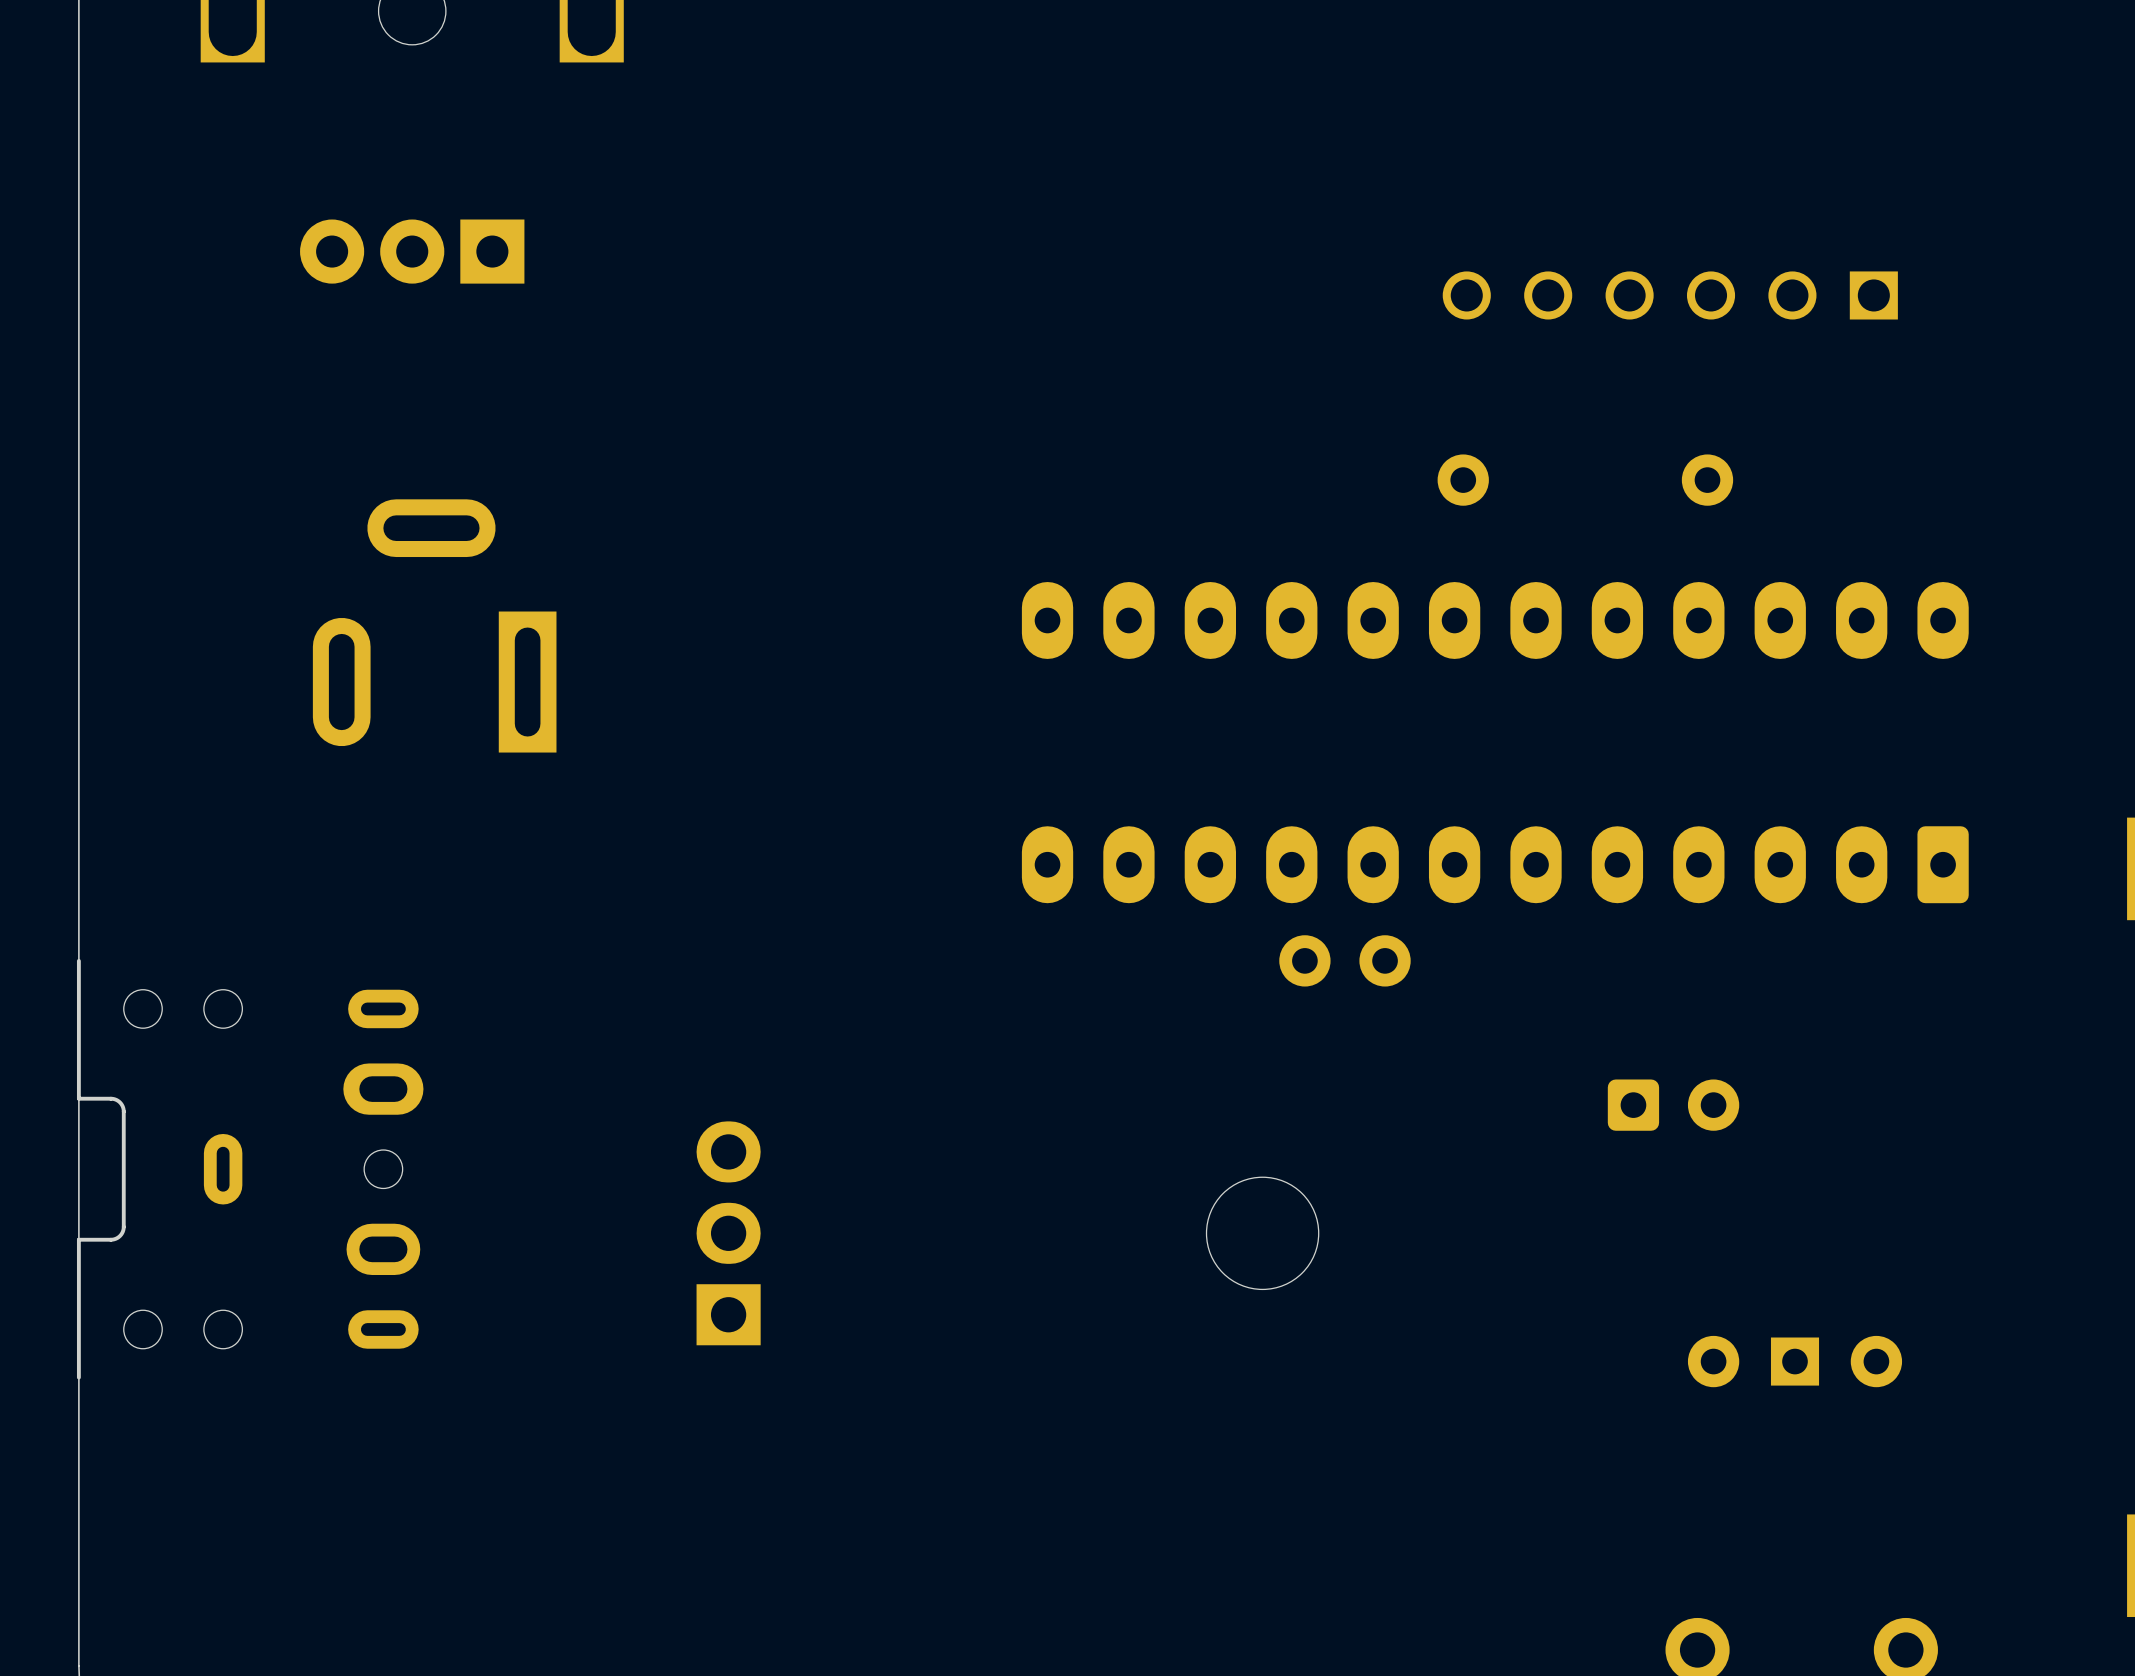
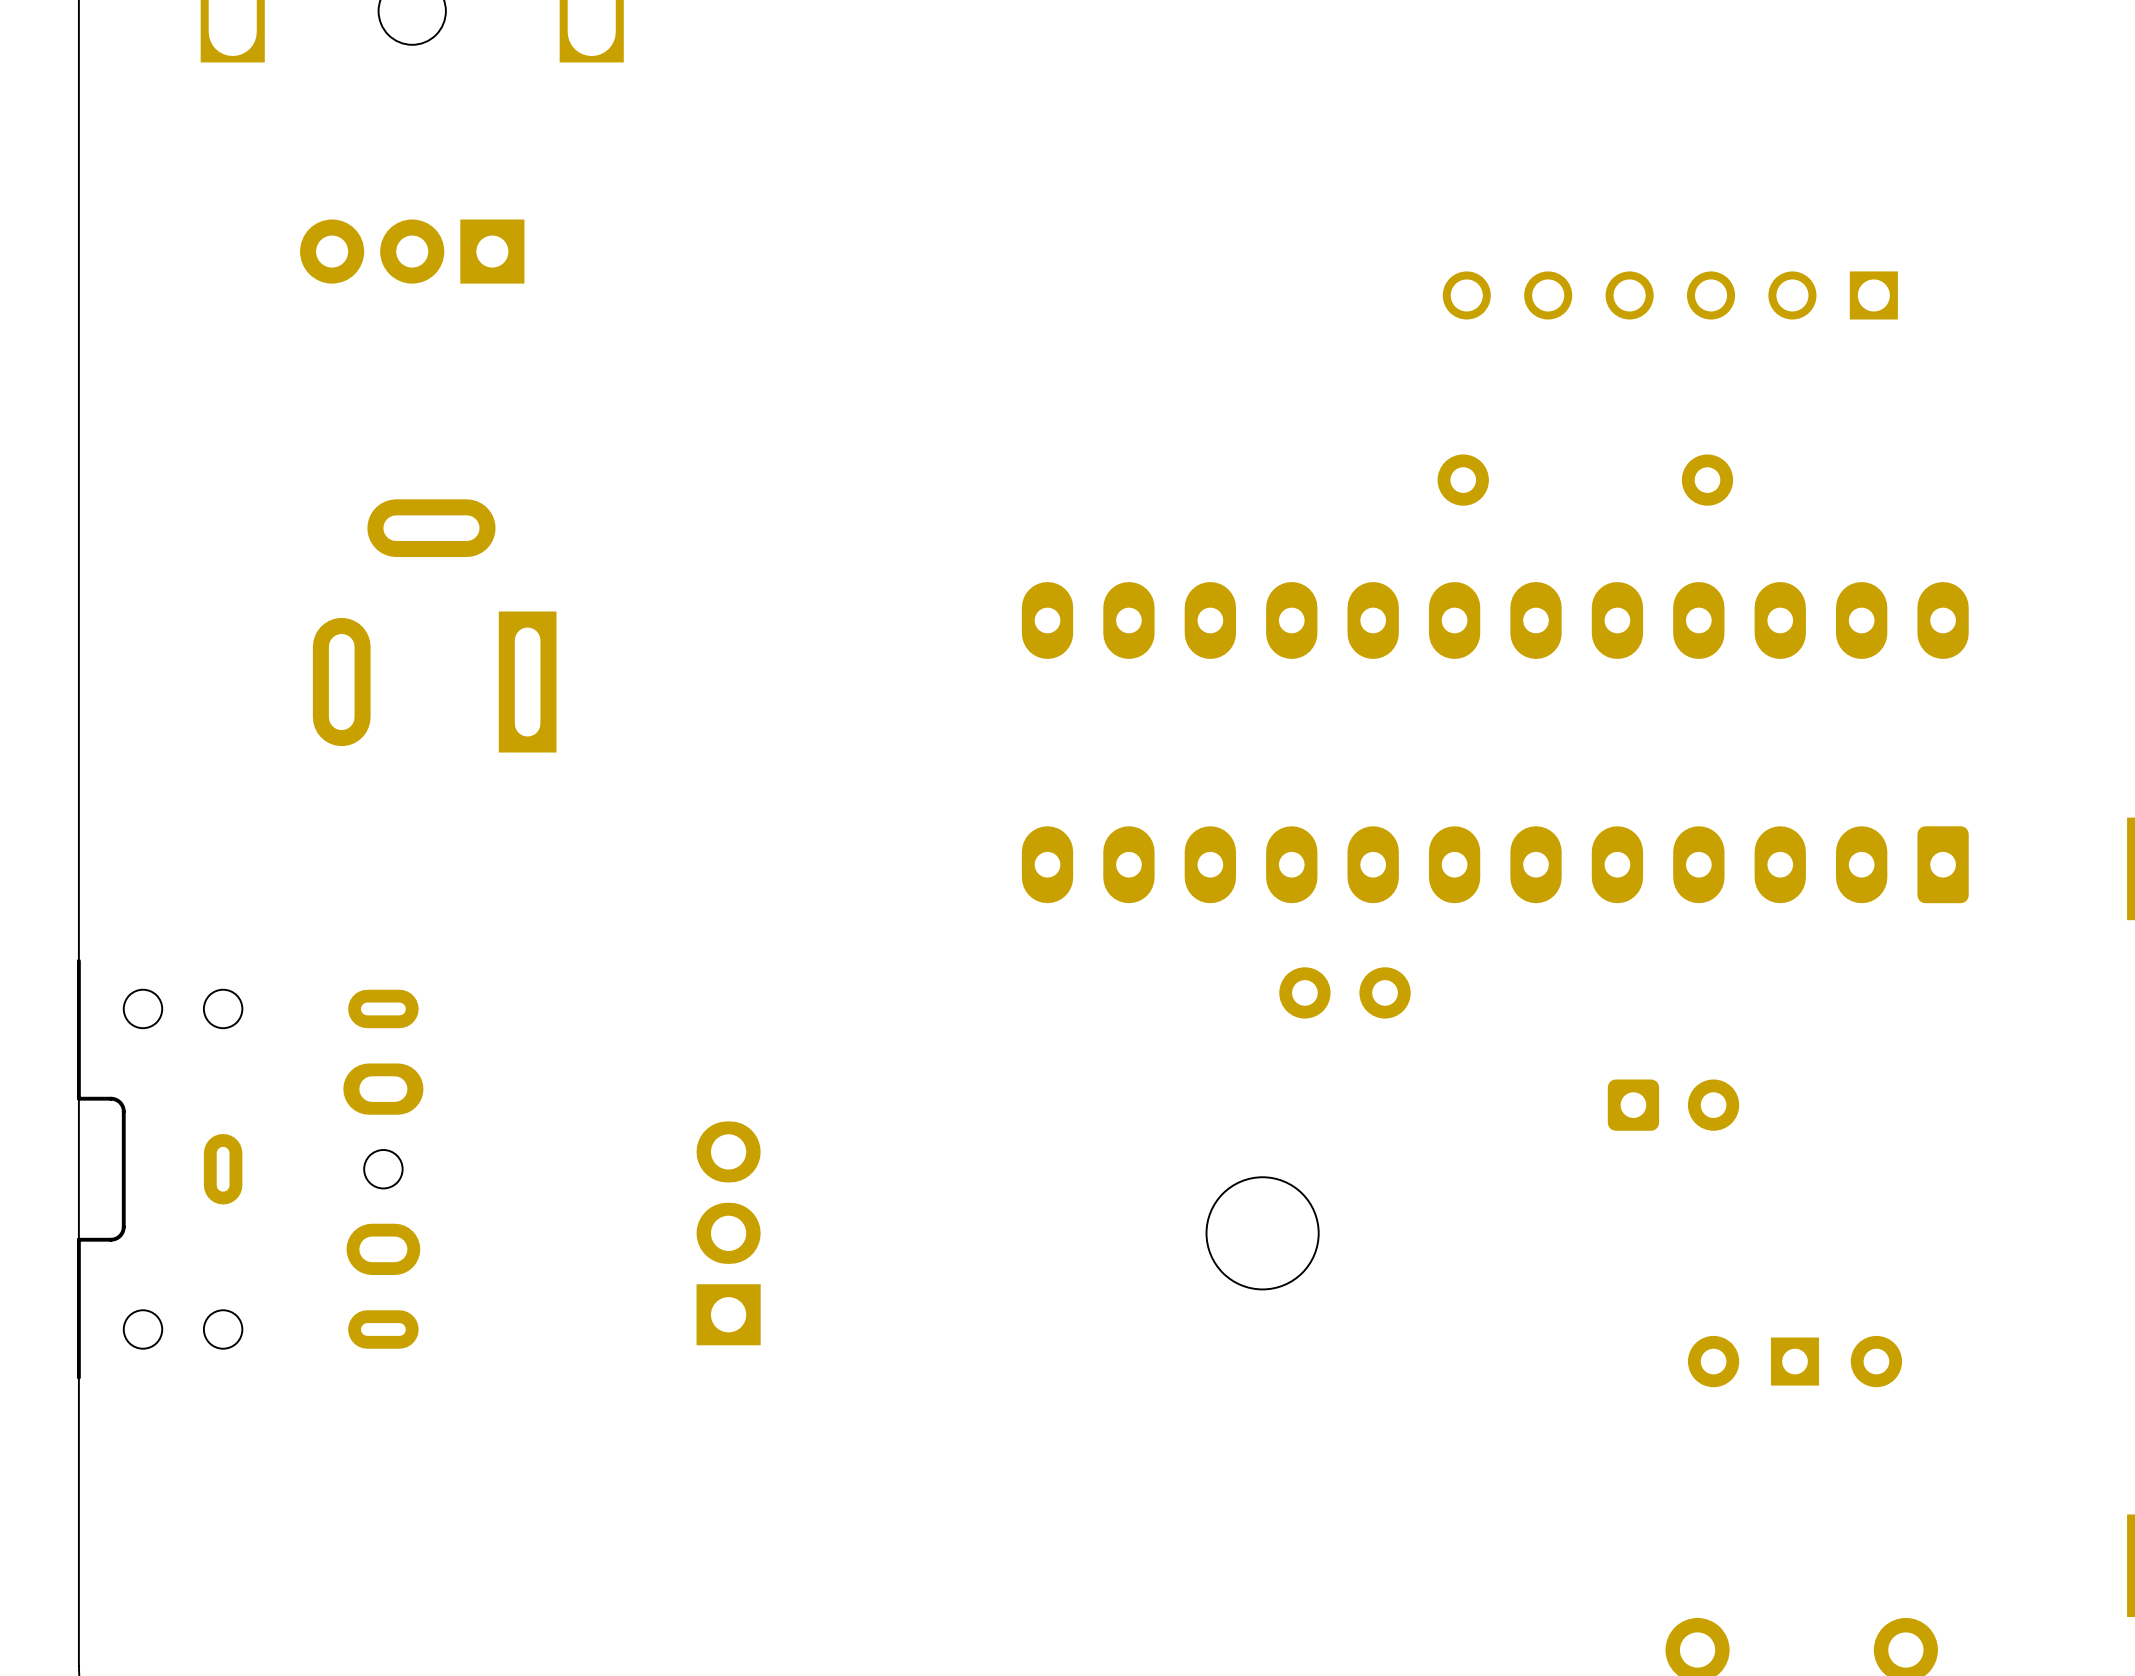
part position: (1344, 960) -> (1344, 992)

